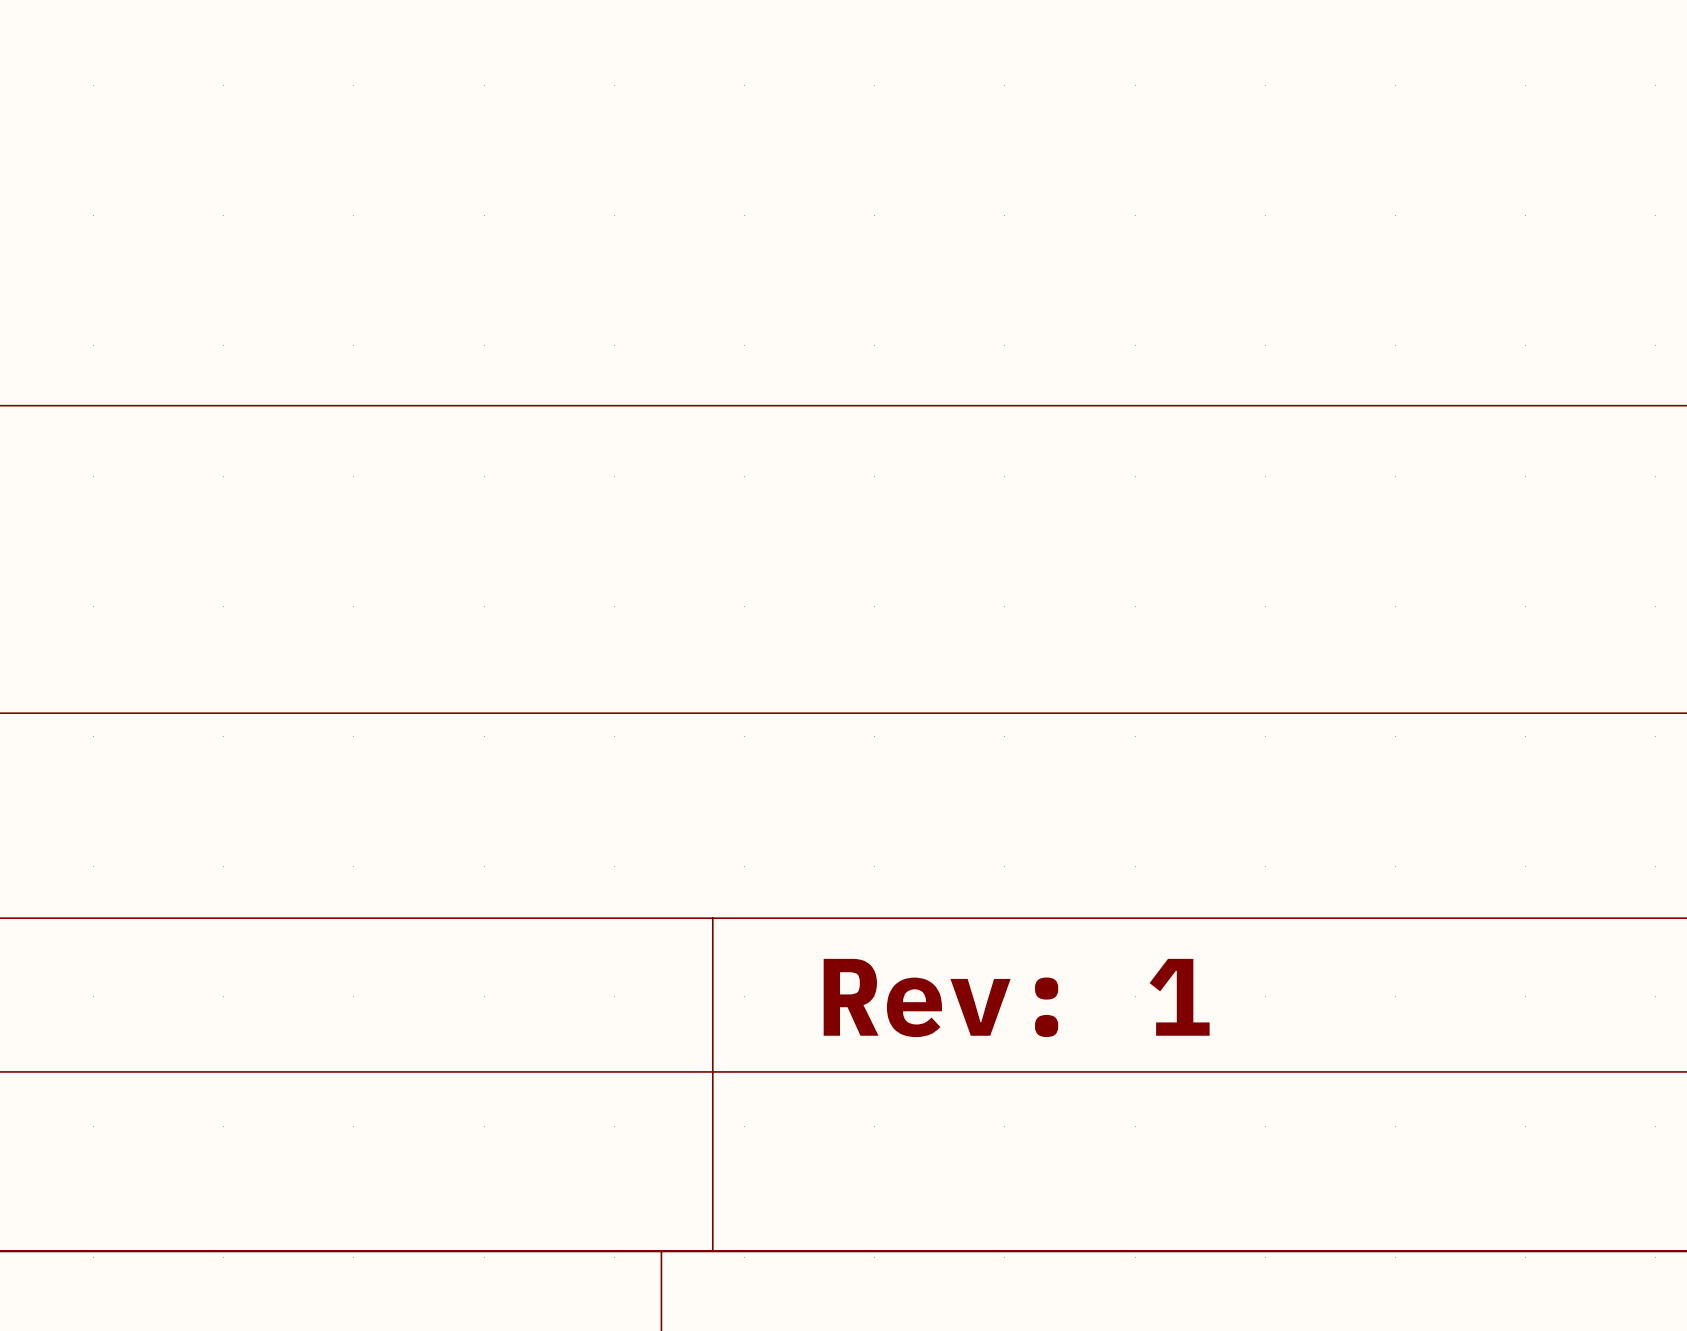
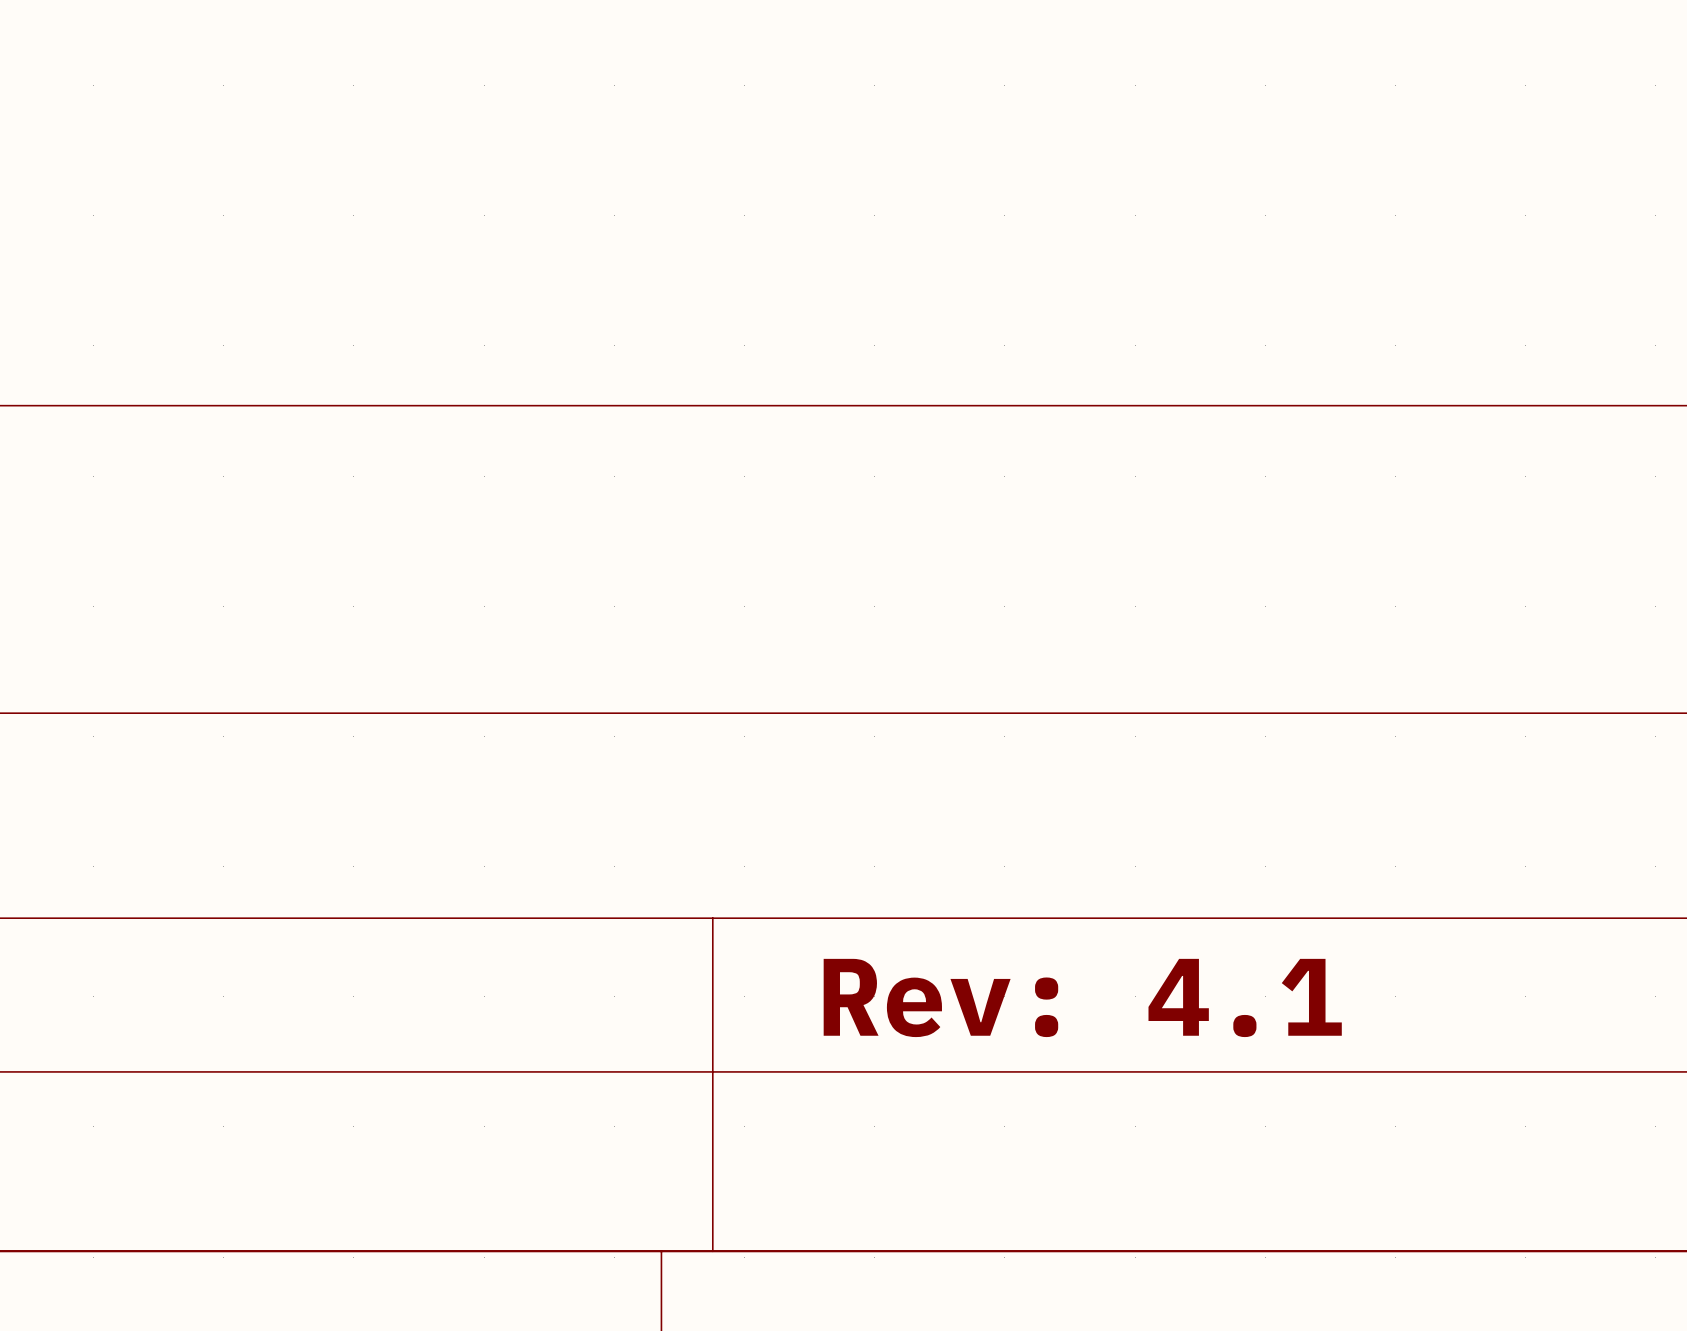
title block: Rev: 1 (1016, 997) -> Rev: 4.1 (1082, 997)

